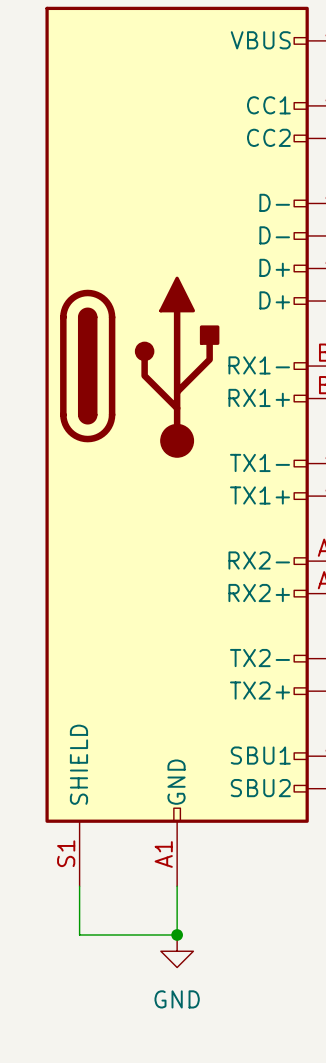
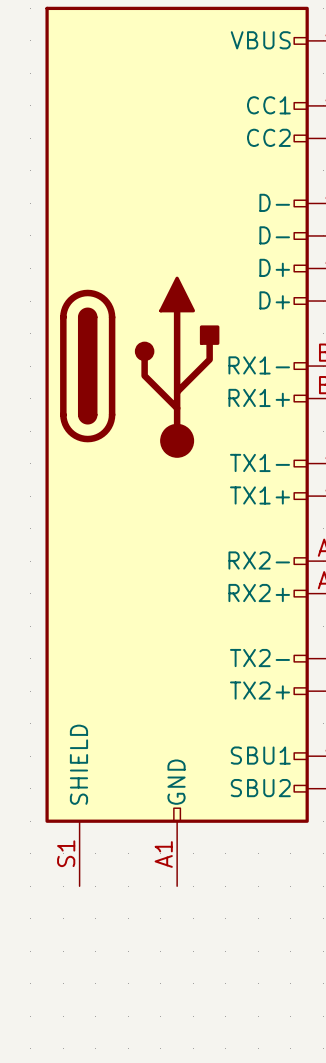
wire: (79, 886) (79, 934) (177, 934) (177, 886) -> none
junction: (177, 934) -> none
power symbol: GND (177, 951) -> none

